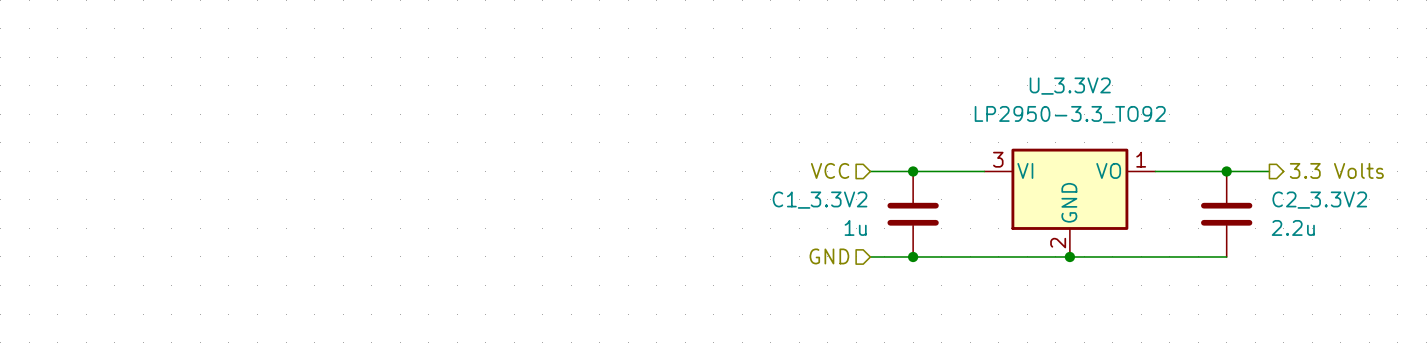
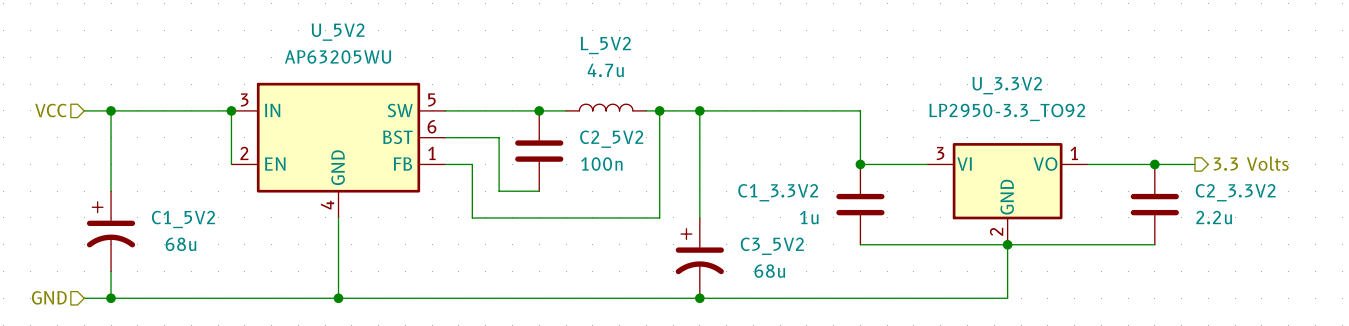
L_5V2: none -> 4.7u (606, 107)
hierarchical label: none -> VCC (50, 110)
wire: none -> (84, 110) (231, 110) (231, 164)
wire: none -> (111, 110) (111, 191)
junction: none -> (111, 110)
junction: none -> (231, 110)
wire: none -> (445, 110) (566, 110)
junction: none -> (539, 110)
wire: none -> (659, 110) (659, 217) (472, 217) (472, 164) (445, 164)
junction: none -> (659, 110)
wire: none -> (699, 110) (699, 217)
junction: none -> (699, 110)
wire: none -> (445, 137) (499, 137) (499, 191) (539, 191)
U_5V2: none -> AP63205WU (338, 150)
C2_5V2: none -> 100n (539, 151)
hierarchical label: VCC (830, 170) -> none
wire: (870, 171) (913, 171) -> (646, 110) (860, 110) (860, 164)
wire: none -> (338, 217) (338, 298)
C1_5V2: none -> 68u (111, 231)
hierarchical label: GND (829, 256) -> none
wire: (870, 256) (913, 256) -> none
junction: (913, 256) -> none
wire: none -> (1007, 244) (1007, 298) (84, 298)
C3_5V2: none -> 68u (699, 258)
wire: none -> (111, 271) (111, 298)
hierarchical label: none -> GND (49, 297)
junction: none -> (111, 298)
junction: none -> (338, 298)
junction: none -> (699, 298)

